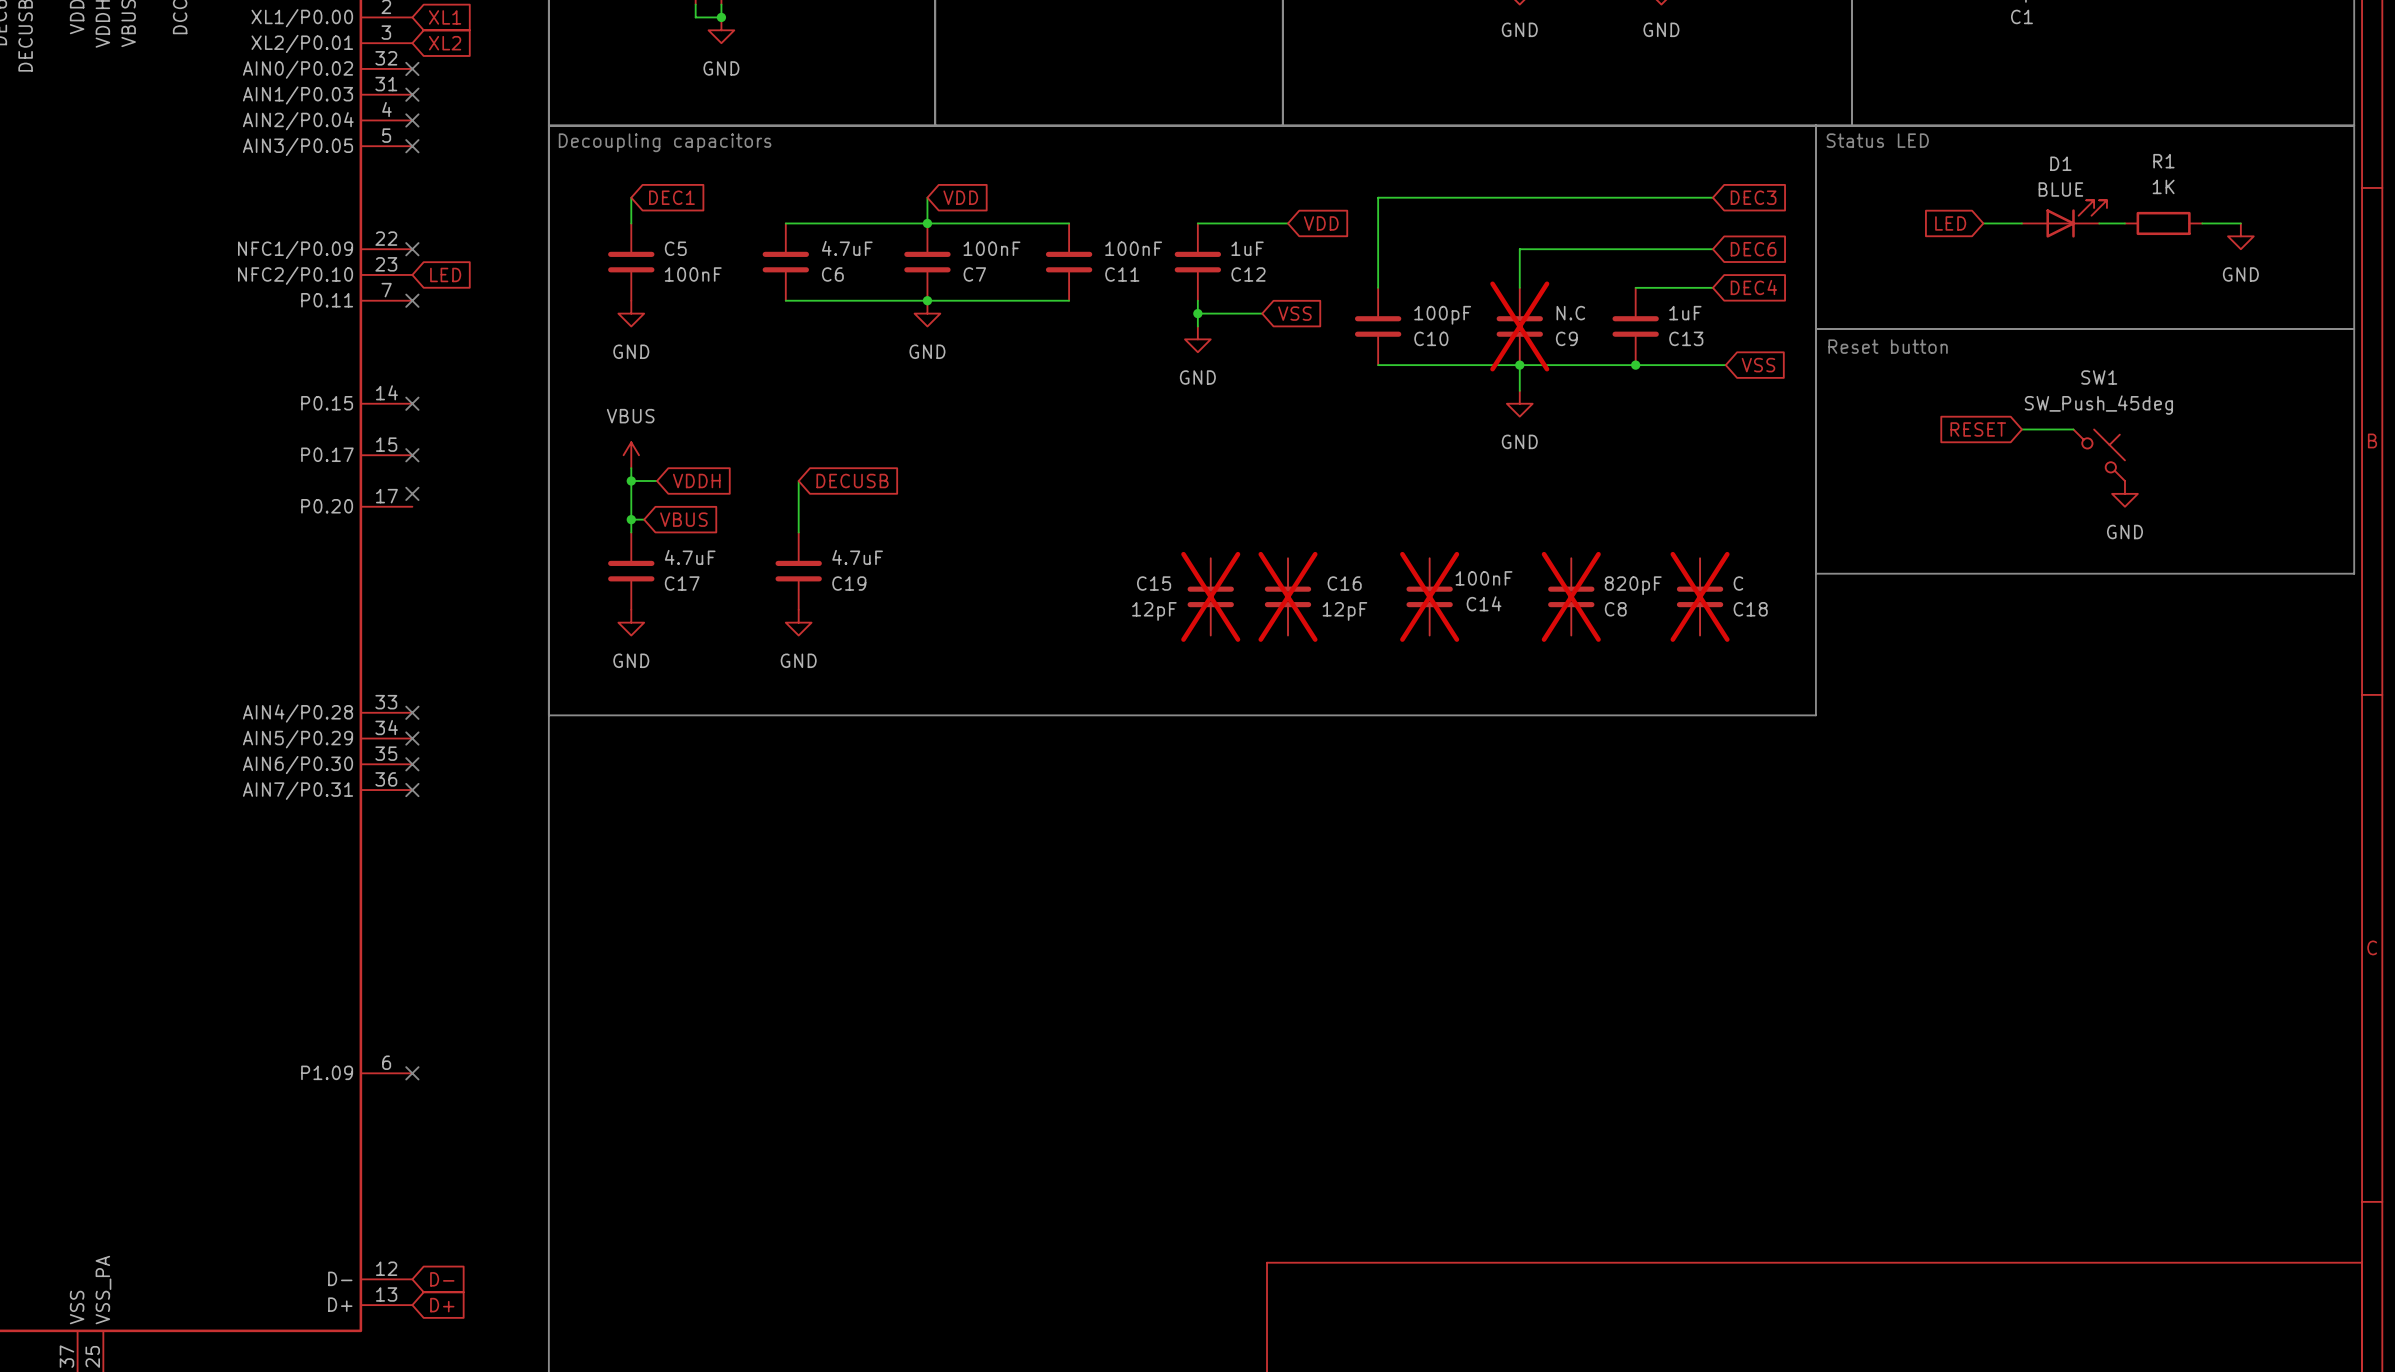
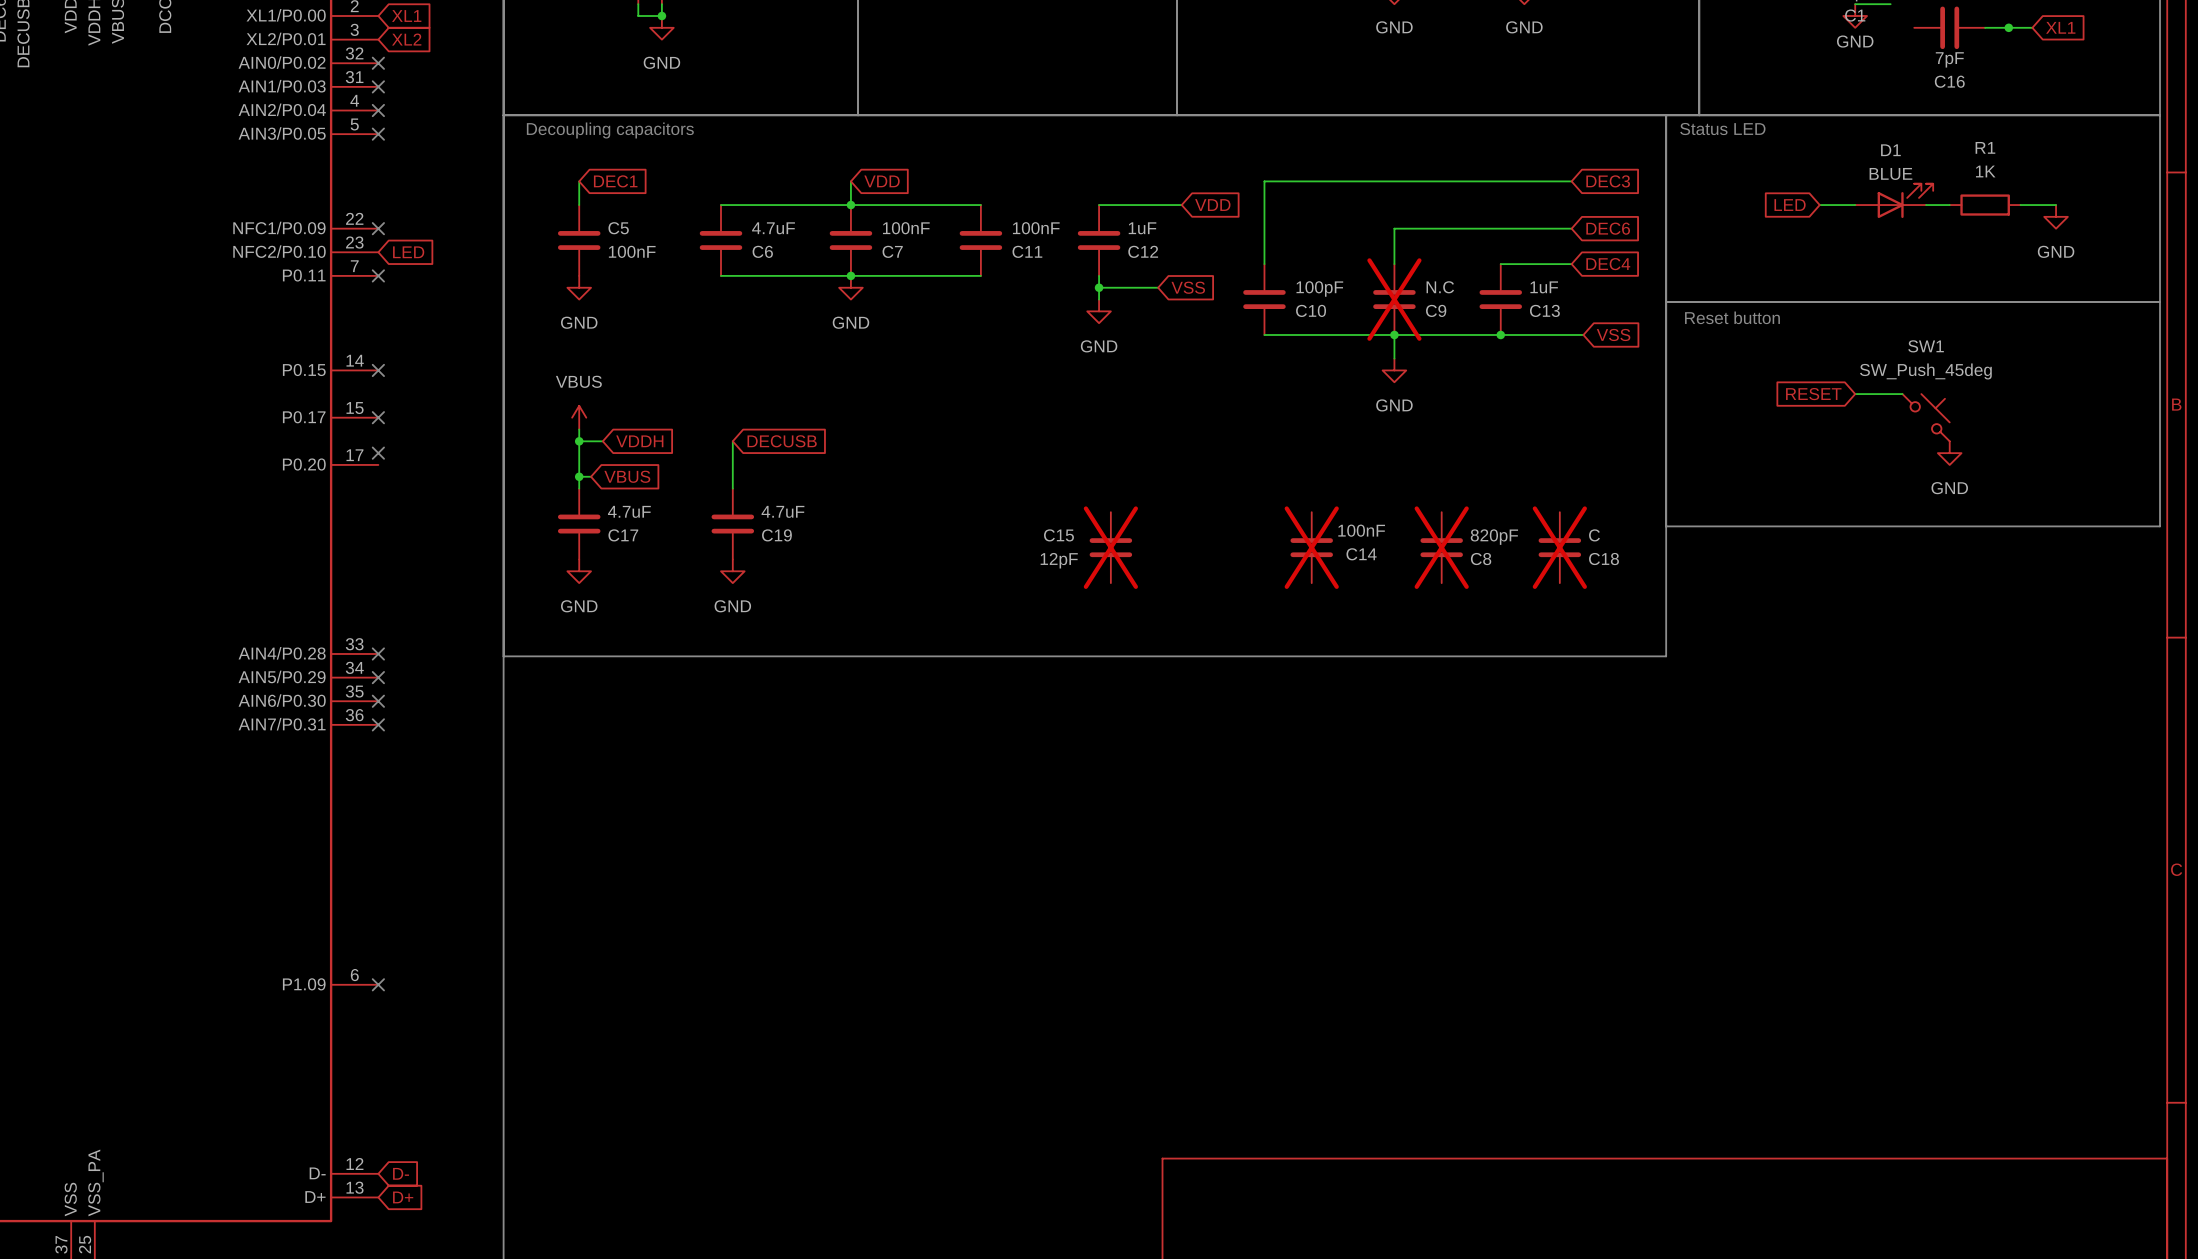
wire: none -> (1855, 4) (1890, 4)
power symbol: none -> GND (1855, 16)
wire: none -> (1985, 27) (2032, 27)
junction: none -> (2008, 27)
global label: none -> XL1 (2060, 27)
C16 rotation: 0° (1288, 596) -> 90° clockwise (1949, 27)
C16 position: (1288, 596) -> (1949, 27)
C16 do-not-place cross: (1288, 596) -> none
C16 value: 12pF (1344, 611) -> 7pF (1949, 59)

